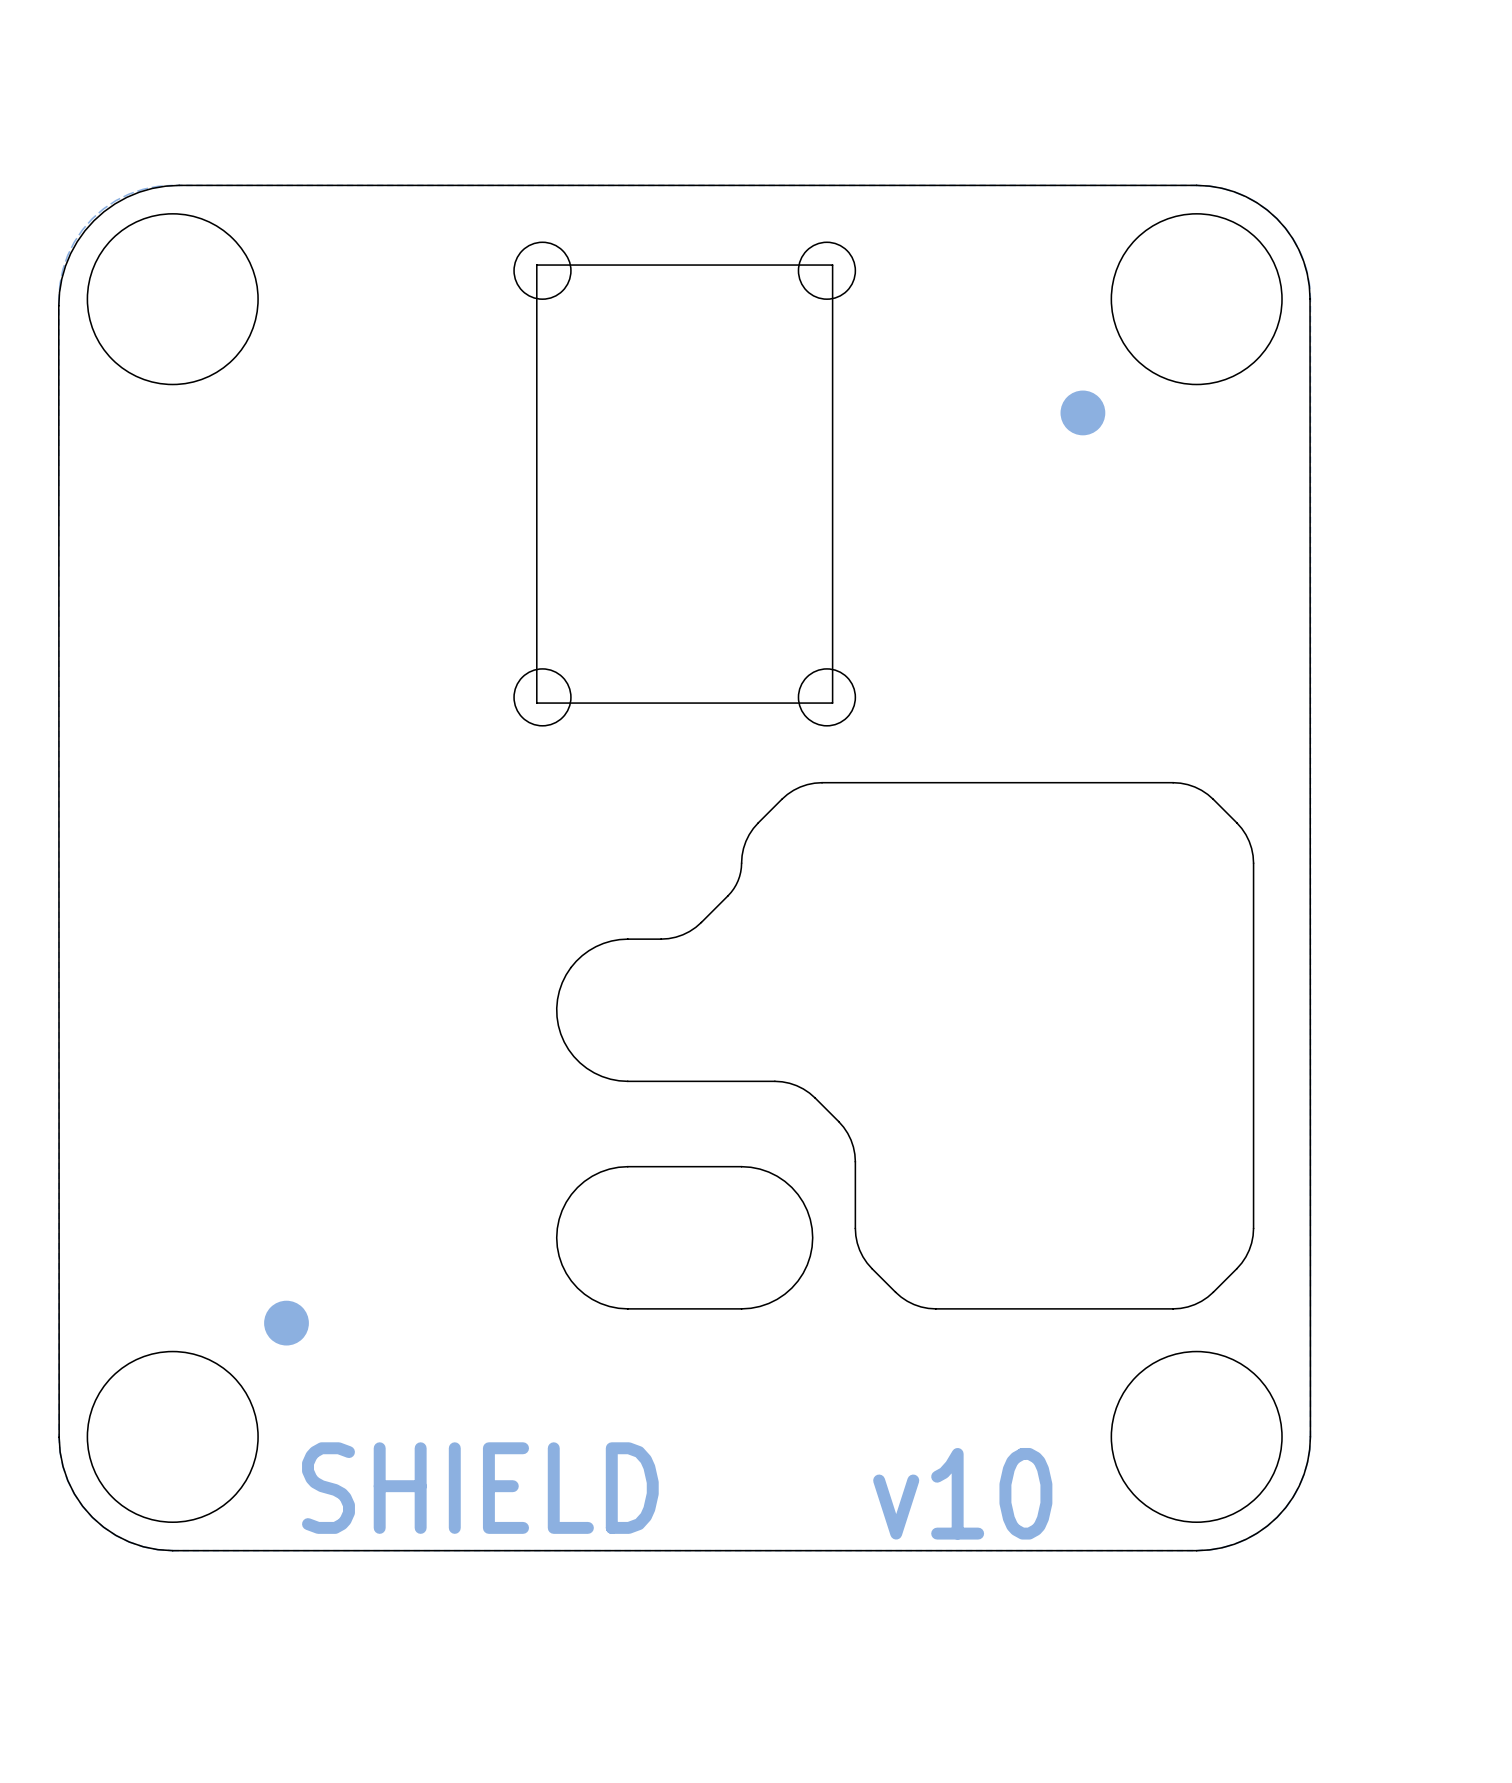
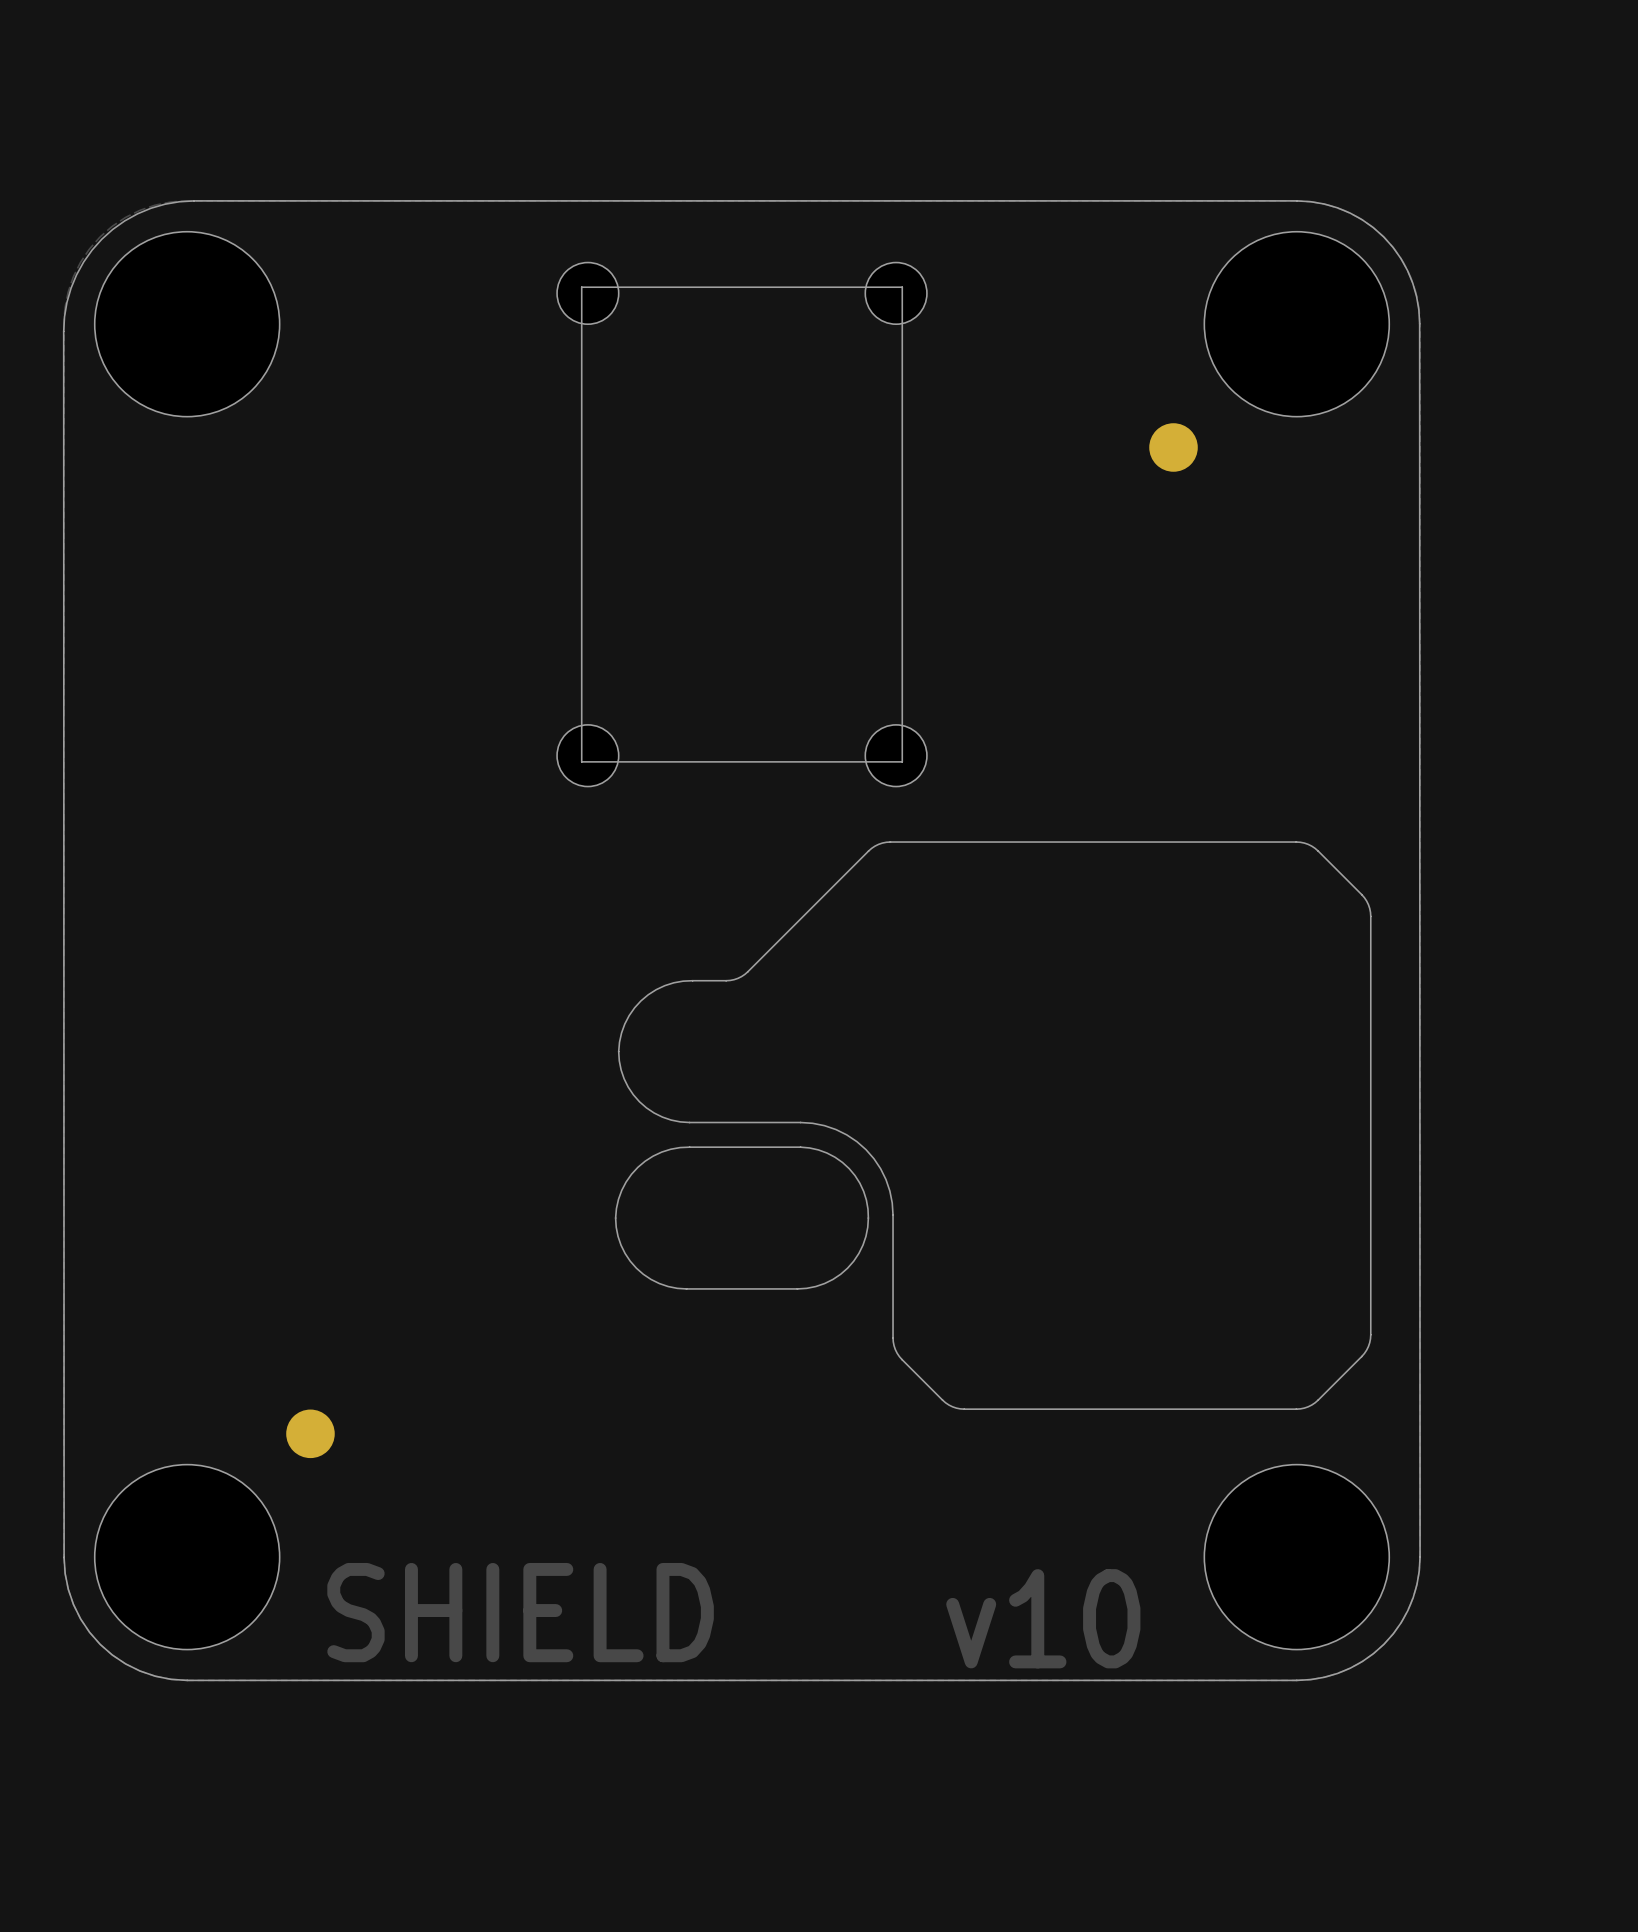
board edge: (1173, 782) (822, 782) (800, 787) (781, 799) (753, 828) (743, 848) (740, 872) (736, 884) (728, 895) (695, 927) (682, 934) (668, 938) (611, 941) (596, 946) (576, 961) (562, 982) (557, 999) (557, 1016) (560, 1034) (568, 1049) (579, 1062) (594, 1072) (610, 1079) (627, 1081) (782, 1081) (796, 1085) (809, 1093) (843, 1127) (853, 1147) (855, 1161) (855, 1235) (862, 1256) (895, 1292) (914, 1304) (935, 1308) (1173, 1308) (1194, 1304) (1213, 1292) (1241, 1263) (1249, 1250) (1253, 1235) (1253, 863) (1251, 848) (1245, 834) (1213, 799) (1194, 787) (1173, 782) -> (1296, 842) (1308, 844) (1318, 851) (1364, 897) (1368, 904) (1370, 916) (1370, 1338) (1368, 1346) (1361, 1356) (1318, 1400) (1308, 1406) (1296, 1409) (964, 1409) (952, 1406) (942, 1400) (902, 1359) (894, 1345) (892, 1202) (889, 1191) (880, 1168) (865, 1149) (846, 1134) (824, 1125) (812, 1123) (689, 1122) (671, 1120) (646, 1107) (633, 1094) (624, 1078) (619, 1060) (619, 1042) (624, 1024) (641, 1000) (656, 989) (673, 982) (730, 980) (741, 976) (868, 851) (878, 844) (890, 842) (1296, 842)
board edge: none -> (800, 1147) (680, 1147) (653, 1156) (631, 1174) (618, 1199) (616, 1227) (625, 1253) (643, 1274) (659, 1283) (677, 1288) (797, 1288) (815, 1286) (832, 1279) (853, 1261) (862, 1245) (867, 1227) (866, 1200) (859, 1183) (842, 1162) (818, 1149) (800, 1147)
board edge: (741, 1166) (627, 1166) (609, 1169) (592, 1176) (571, 1194) (559, 1219) (557, 1247) (566, 1273) (577, 1288) (592, 1299) (618, 1308) (741, 1308) (759, 1306) (777, 1299) (798, 1281) (807, 1264) (812, 1237) (810, 1219) (798, 1194) (784, 1181) (768, 1172) (741, 1166) -> none

